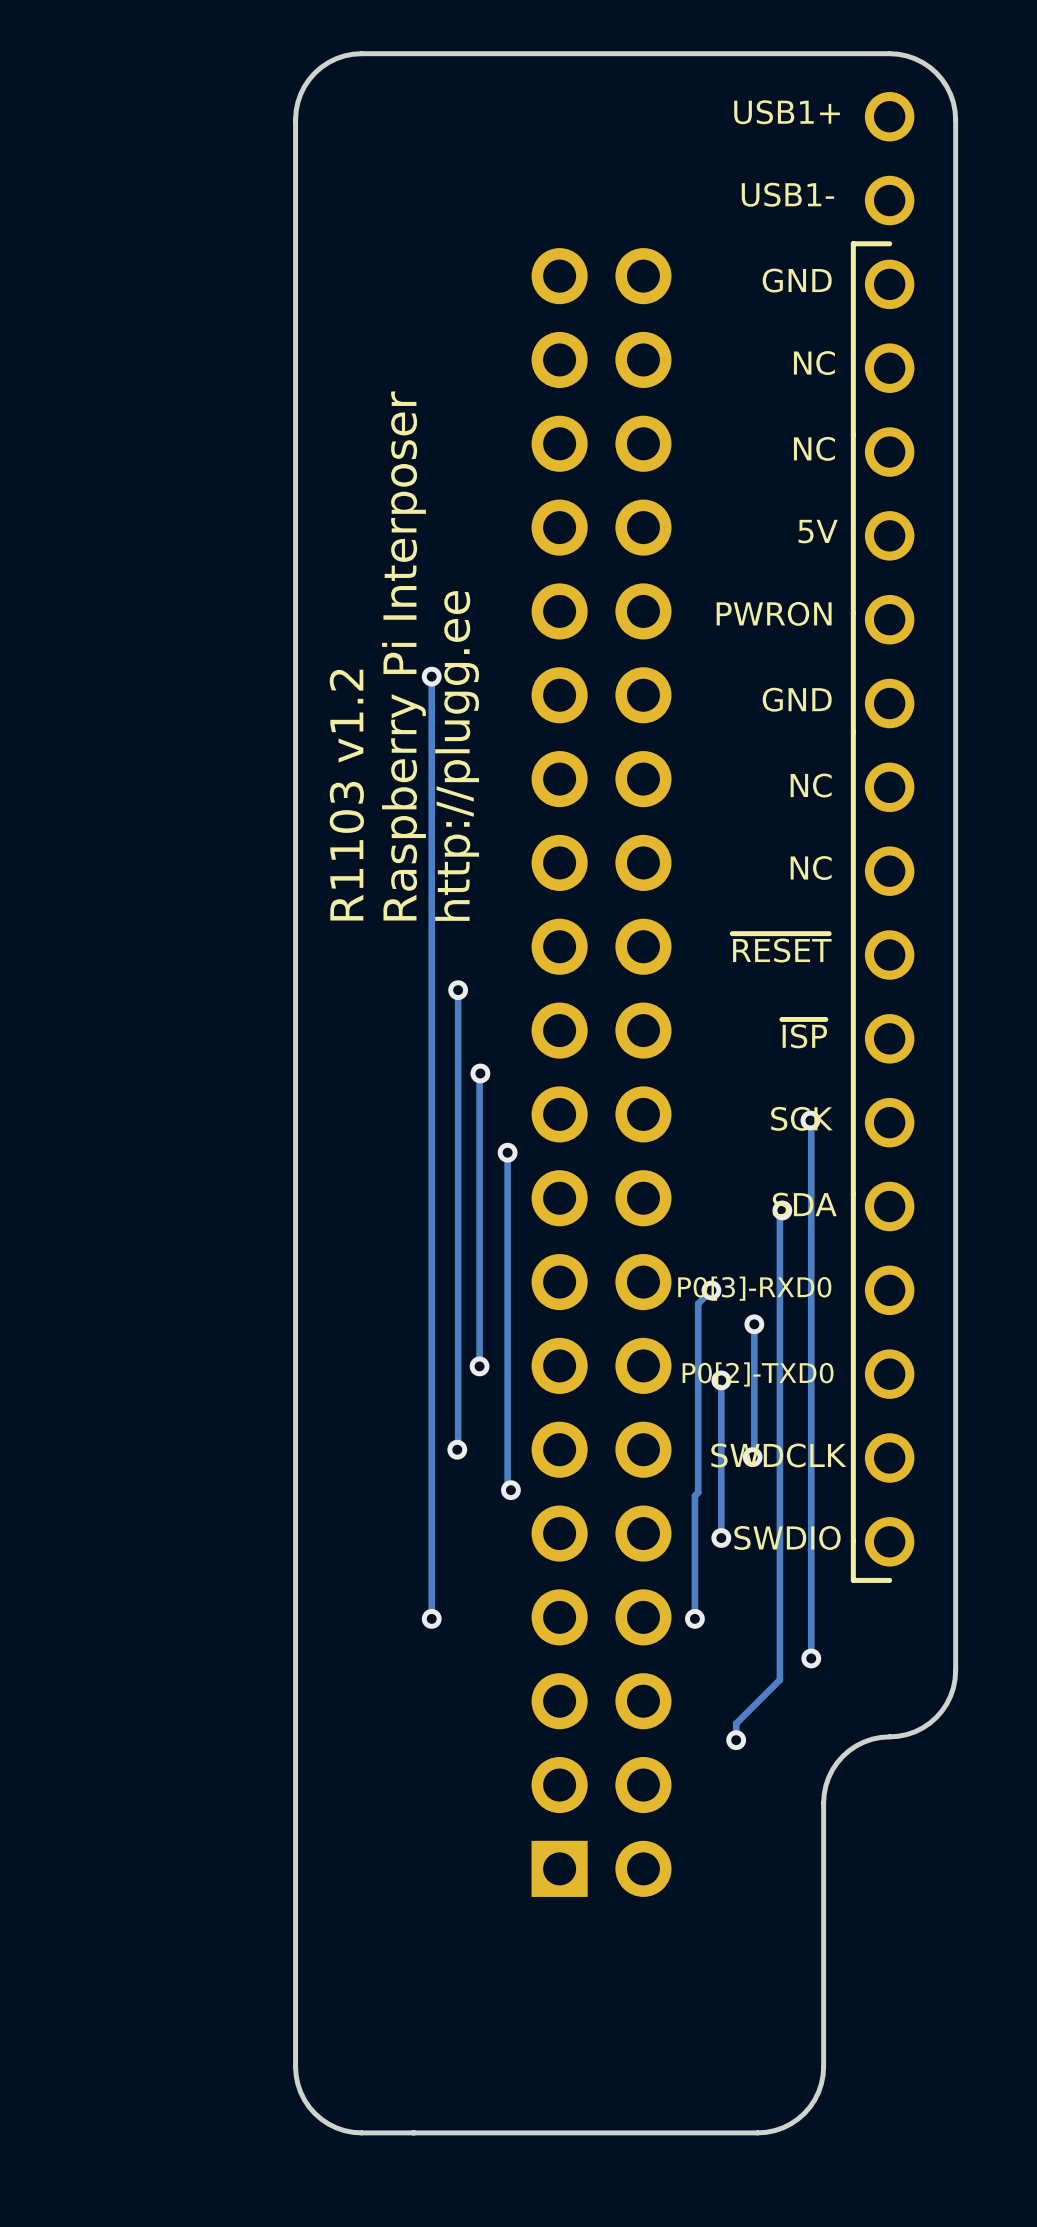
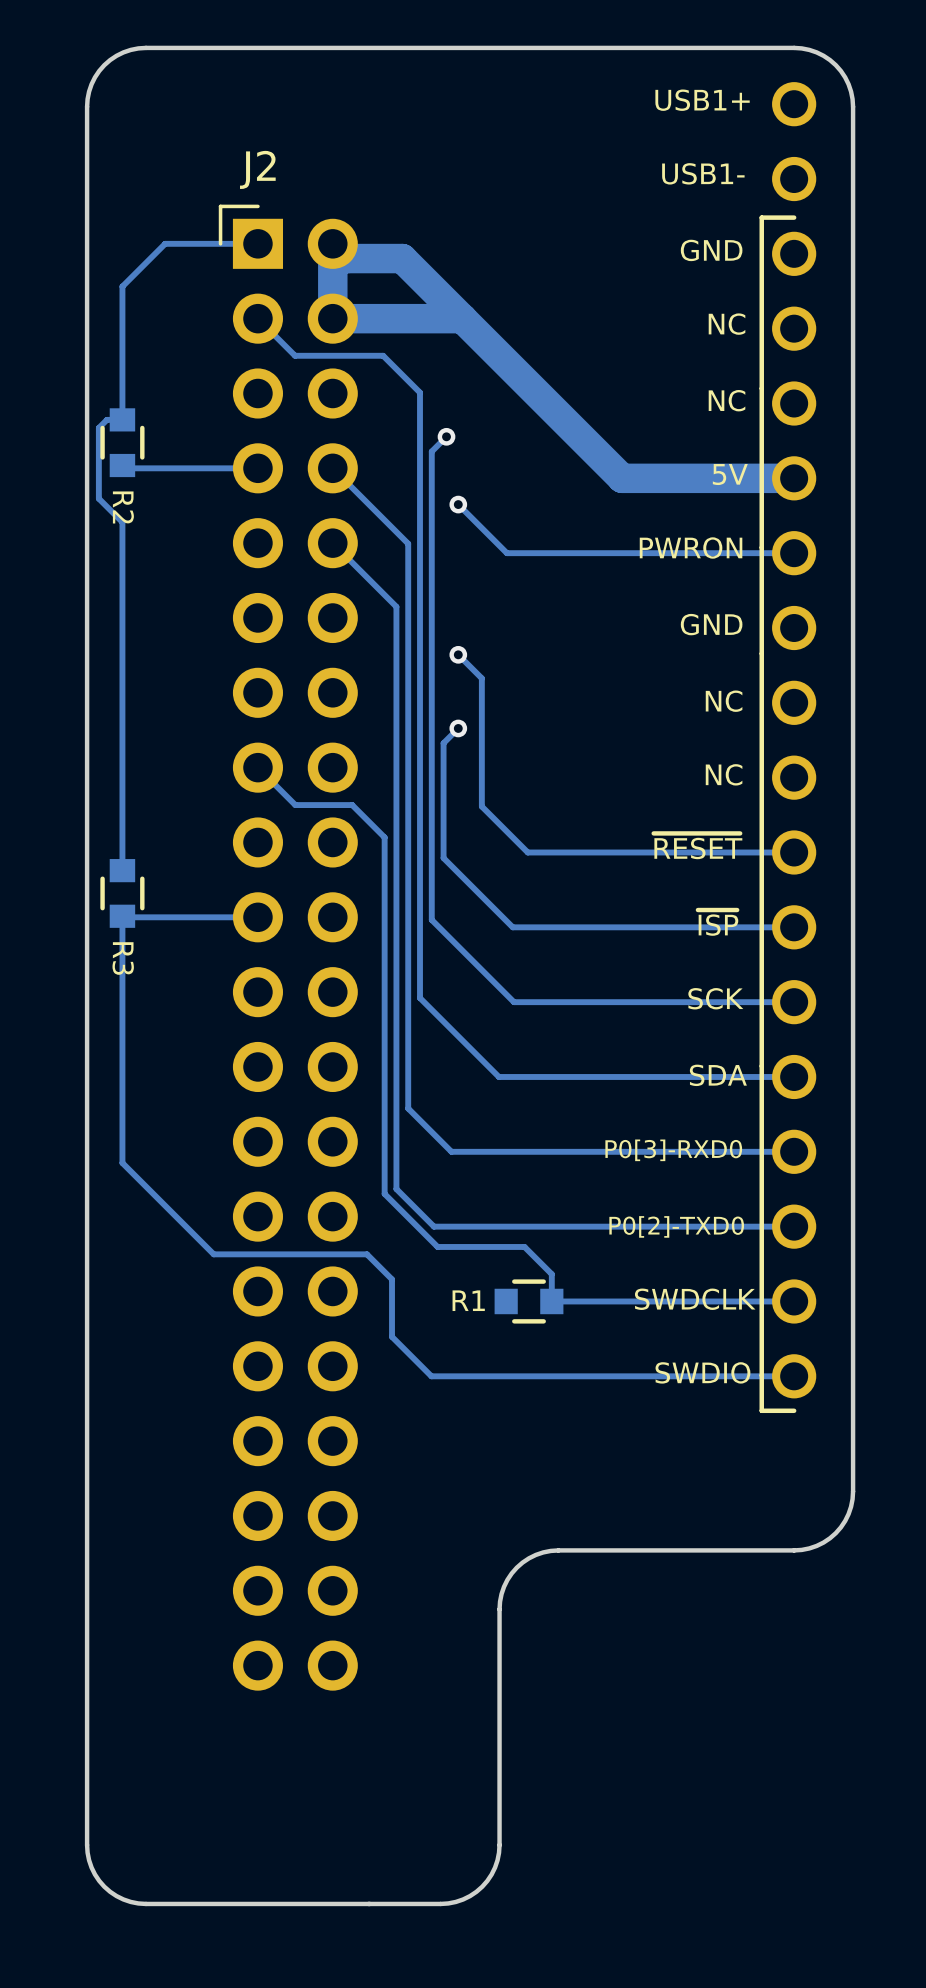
board edge: (361, 53) (336, 58) (314, 73) (300, 94) (295, 119) (295, 2066) (300, 2092) (314, 2113) (336, 2127) (361, 2132) -> (322, 47) (146, 47) (130, 49) (116, 55) (99, 70) (91, 84) (87, 106) (87, 1852) (91, 1867) (104, 1886) (116, 1896) (130, 1901) (146, 1903) (322, 1903)
track: none -> (257, 243) (165, 243) (122, 286) (122, 419) (106, 419) (98, 427) (98, 498) (122, 522) (122, 870)
track: none -> (257, 318) (295, 355) (383, 355) (420, 392) (420, 998) (498, 1076) (794, 1076)
track: none -> (462, 318) (332, 318) (332, 243) (347, 258) (402, 258) (622, 478) (794, 478)
track: none -> (446, 436) (431, 451) (431, 919) (513, 1002) (794, 1002)
via: none -> (446, 436)
R2: none -> (122, 442)
track: none -> (122, 465) (125, 468) (257, 468)
track: none -> (332, 468) (408, 543) (408, 1108) (451, 1151) (794, 1151)
track: none -> (458, 504) (506, 553) (794, 553)
via: none -> (458, 504)
track: none -> (332, 543) (396, 606) (396, 1189) (434, 1226) (794, 1226)
text: Raspberry Pi Interposer (403, 656) -> none
track: (431, 676) (431, 1618) -> none
via: (431, 676) -> none
track: none -> (458, 654) (481, 678) (481, 806) (527, 852) (794, 852)
via: none -> (458, 654)
text: http://plugg.ee (457, 756) -> none
text: R1103 v1.2 (346, 795) -> none
track: none -> (458, 728) (443, 743) (443, 858) (512, 927) (794, 927)
via: none -> (458, 728)
track: none -> (257, 767) (295, 805) (352, 805) (384, 837) (384, 1193) (437, 1246) (524, 1246) (551, 1274) (551, 1301) (794, 1301)
track: (458, 990) (457, 1449) -> none
via: (458, 990) -> none
R3: none -> (122, 893)
track: none -> (257, 917) (122, 916) (122, 1163) (213, 1254) (366, 1254) (392, 1279) (392, 1336) (431, 1376) (794, 1376)
J2 side: top (601, 1072) -> bottom (288, 947)
track: (480, 1073) (479, 1366) -> none
via: (480, 1073) -> none
track: (810, 1120) (811, 1658) -> none
via: (810, 1120) -> none
track: (507, 1152) (507, 1486) (510, 1490) -> none
via: (507, 1152) -> none
track: (782, 1210) (779, 1212) (779, 1679) (736, 1723) (736, 1740) -> none
via: (782, 1210) -> none
track: (711, 1290) (698, 1303) (698, 1492) (694, 1495) (694, 1618) -> none
via: (711, 1290) -> none
track: (754, 1324) (754, 1455) (752, 1457) -> none
via: (754, 1324) -> none
via: (479, 1366) -> none
track: (720, 1380) (721, 1538) -> none
via: (721, 1380) -> none
via: (457, 1449) -> none
R1: none -> (529, 1301)
via: (752, 1457) -> none
via: (510, 1490) -> none
via: (721, 1538) -> none
via: (431, 1618) -> none
via: (694, 1618) -> none
via: (811, 1658) -> none
board edge: (889, 1736) (864, 1741) (849, 1750) (837, 1762) (825, 1785) (823, 1802) (823, 2075) (818, 2092) (804, 2113) (782, 2127) (757, 2132) (493, 2132) -> (794, 1550) (558, 1550) (535, 1554) (516, 1567) (504, 1586) (500, 1601) (499, 1845) (497, 1860) (487, 1880) (476, 1891) (463, 1899) (440, 1903)
via: (736, 1740) -> none

